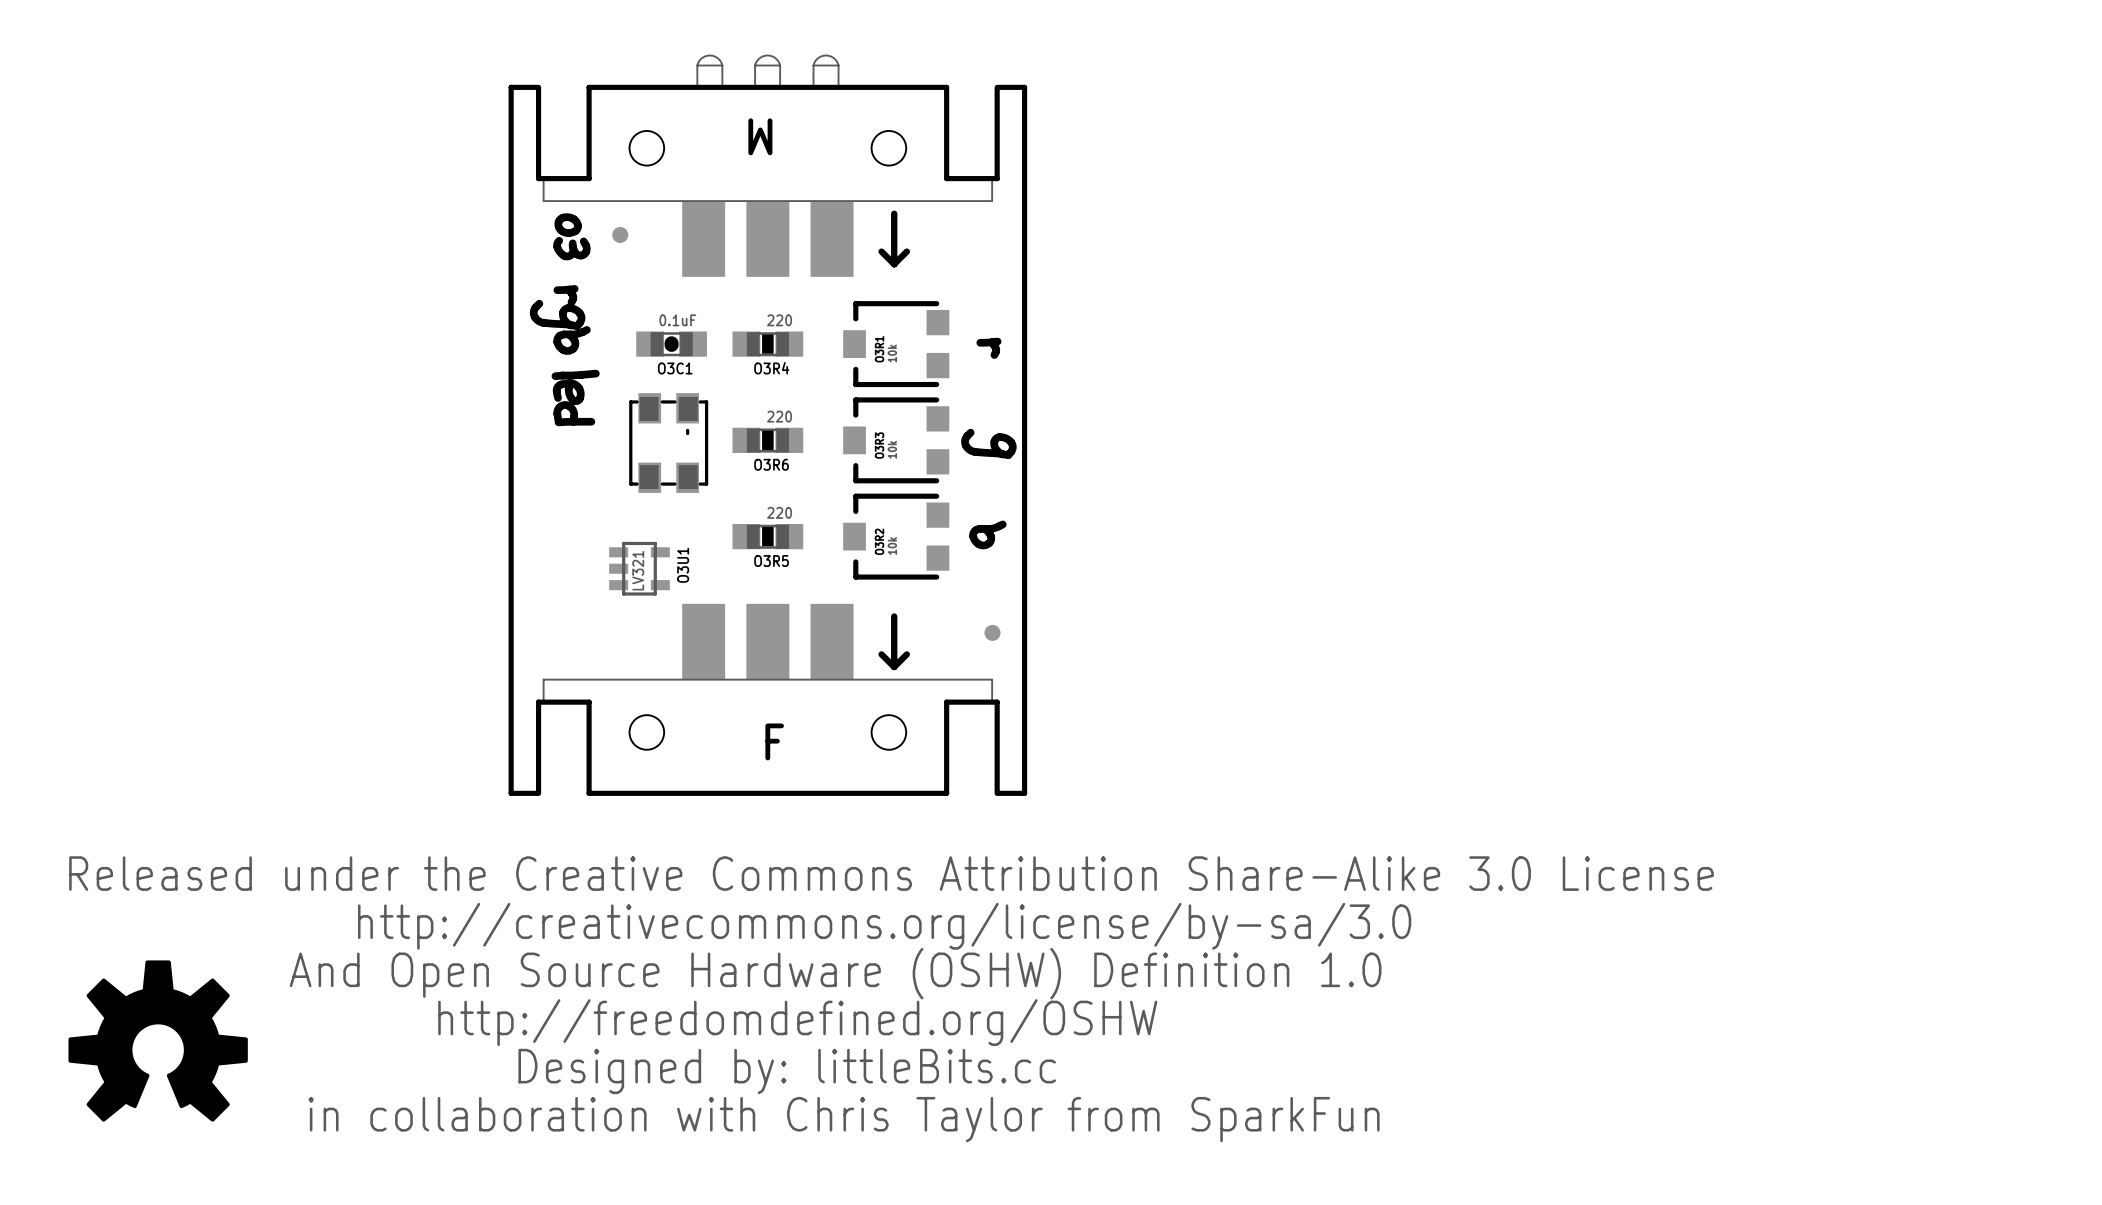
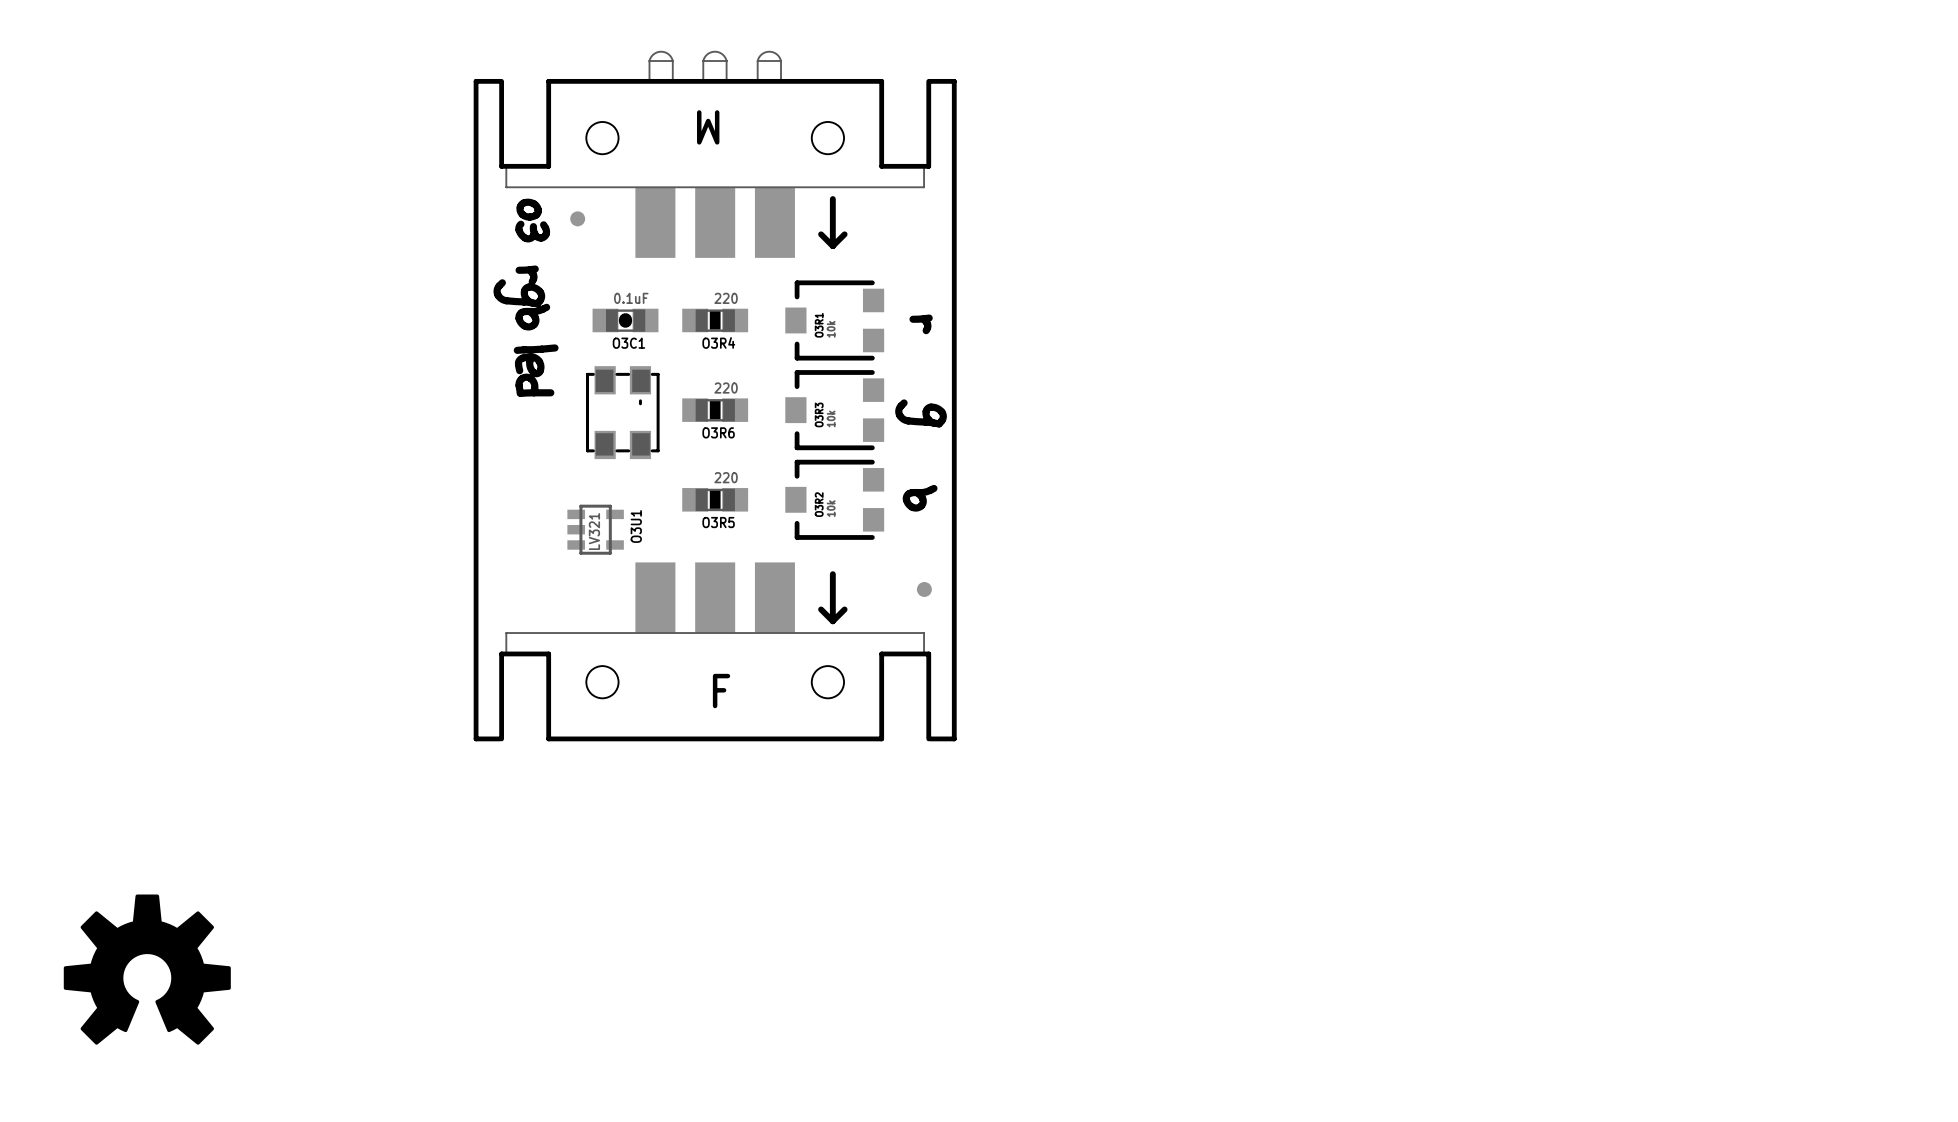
drawing: [69, 856, 1714, 1143] -> none

